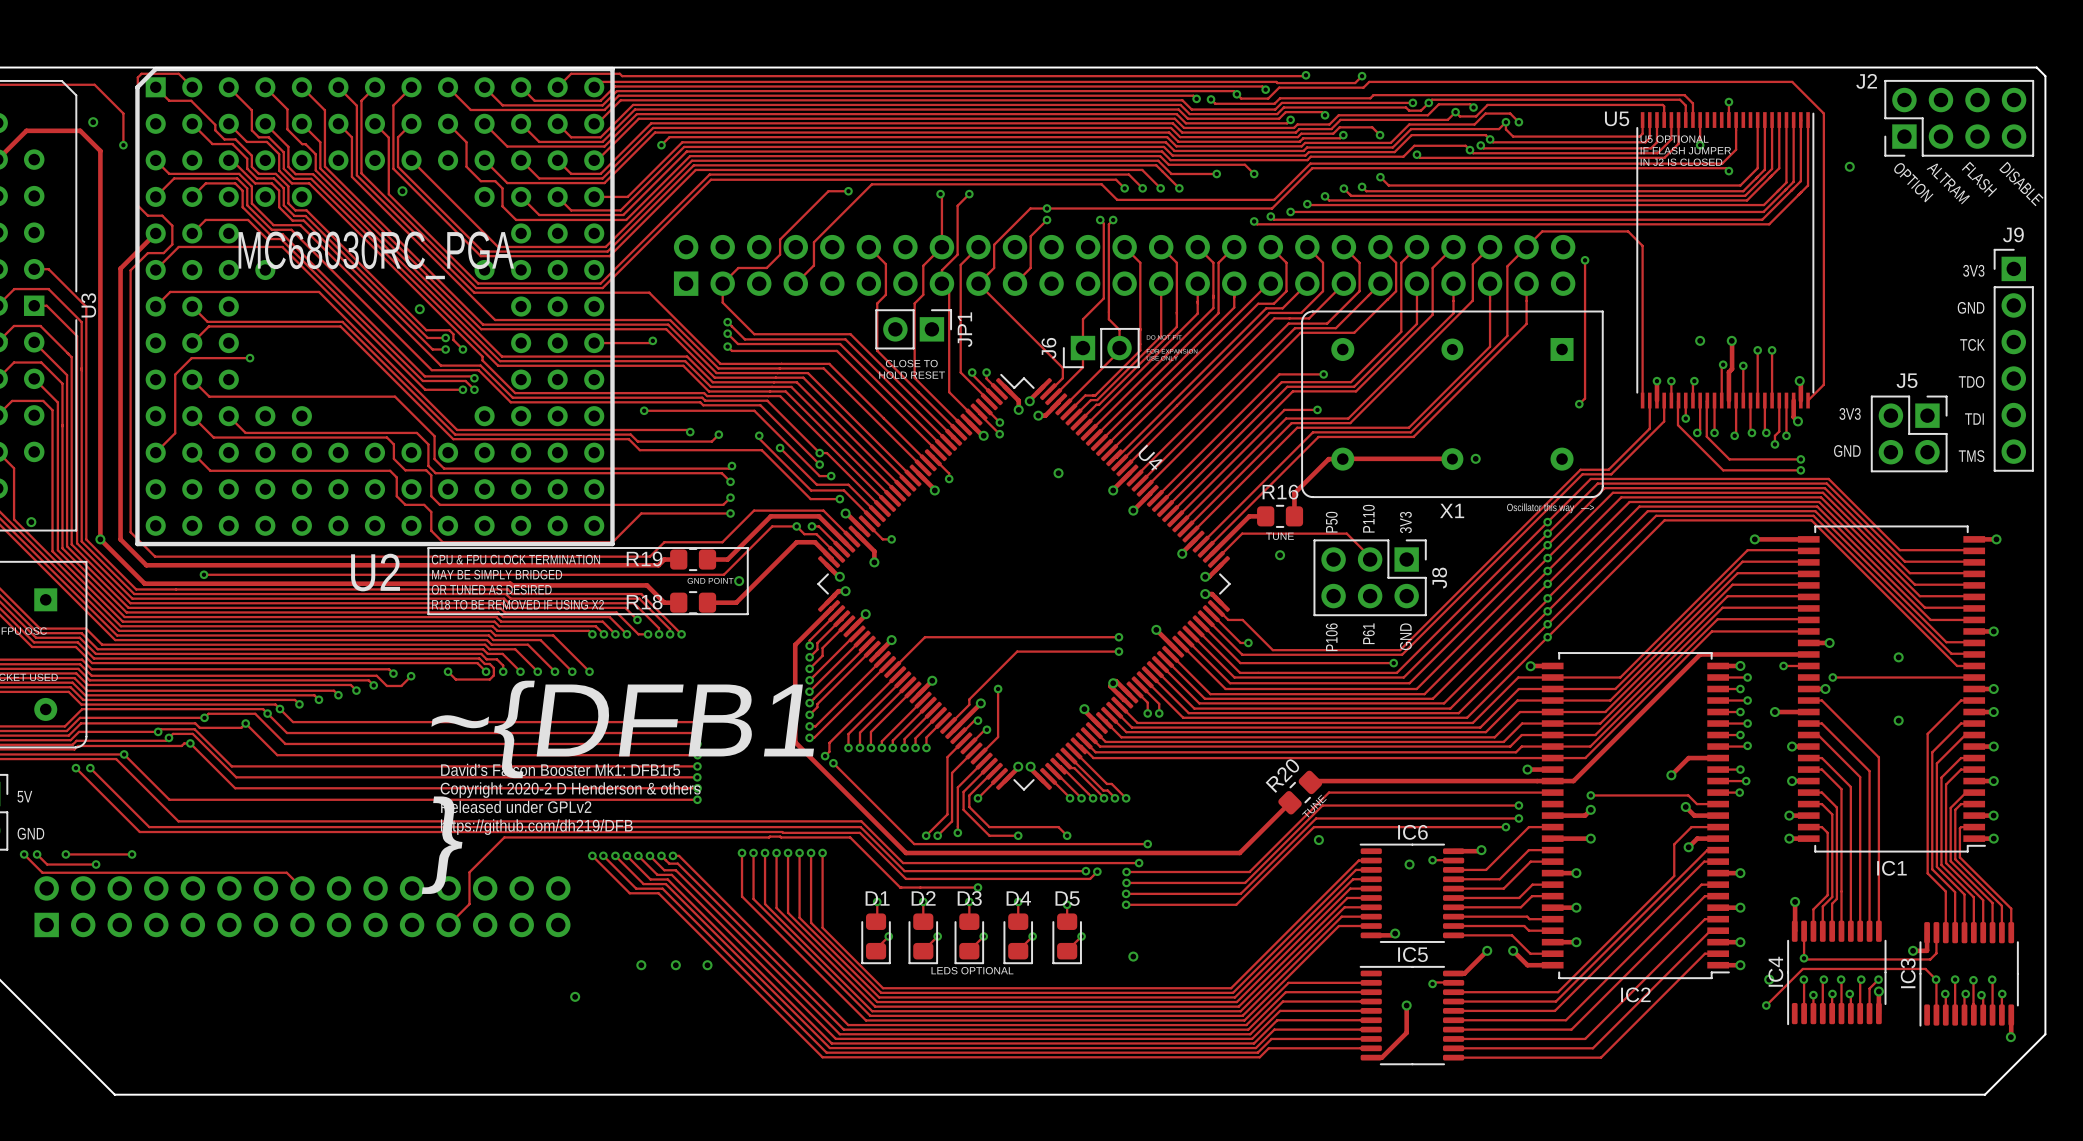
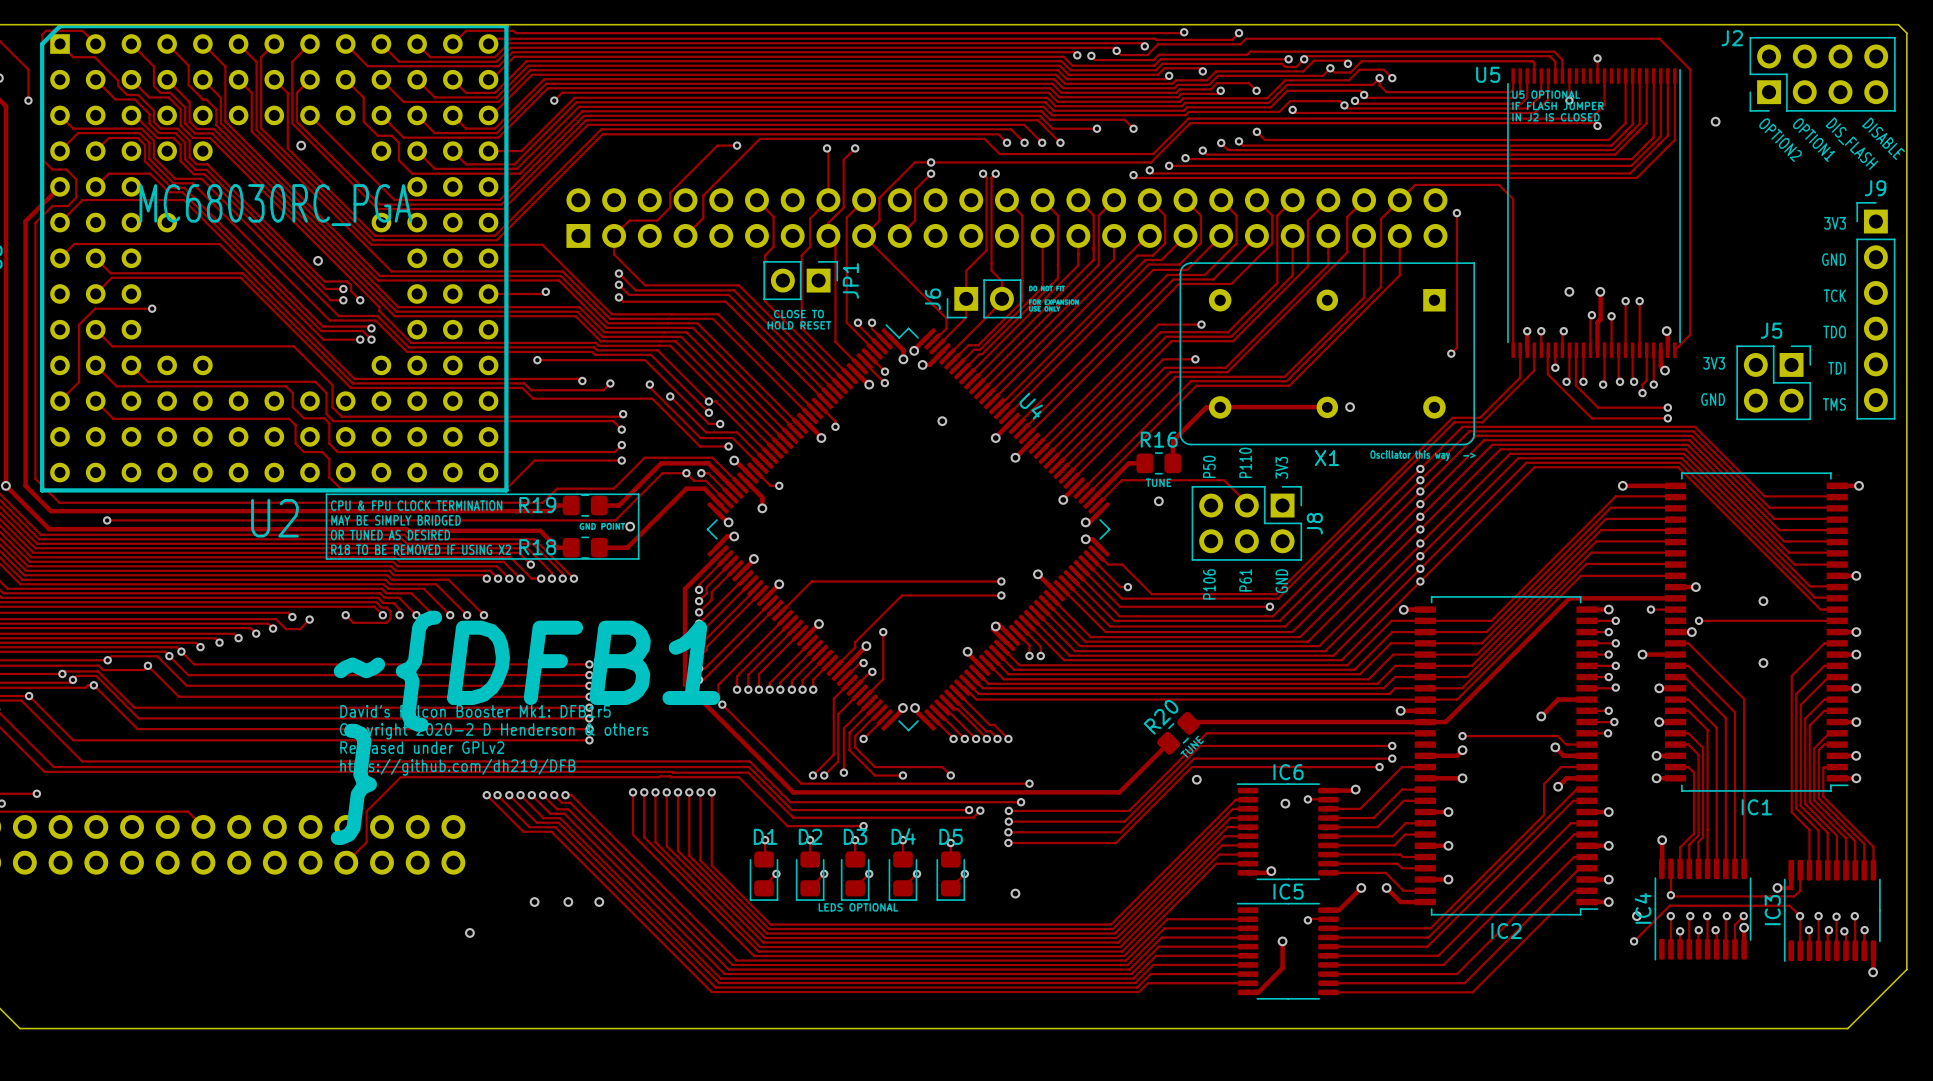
text: FLASH (1979, 179) -> DIS_FLASH (1852, 143)
text: OPTION (1913, 182) -> OPTION2 (1780, 140)
text: ALTRAM (1948, 183) -> OPTION1 (1813, 140)

